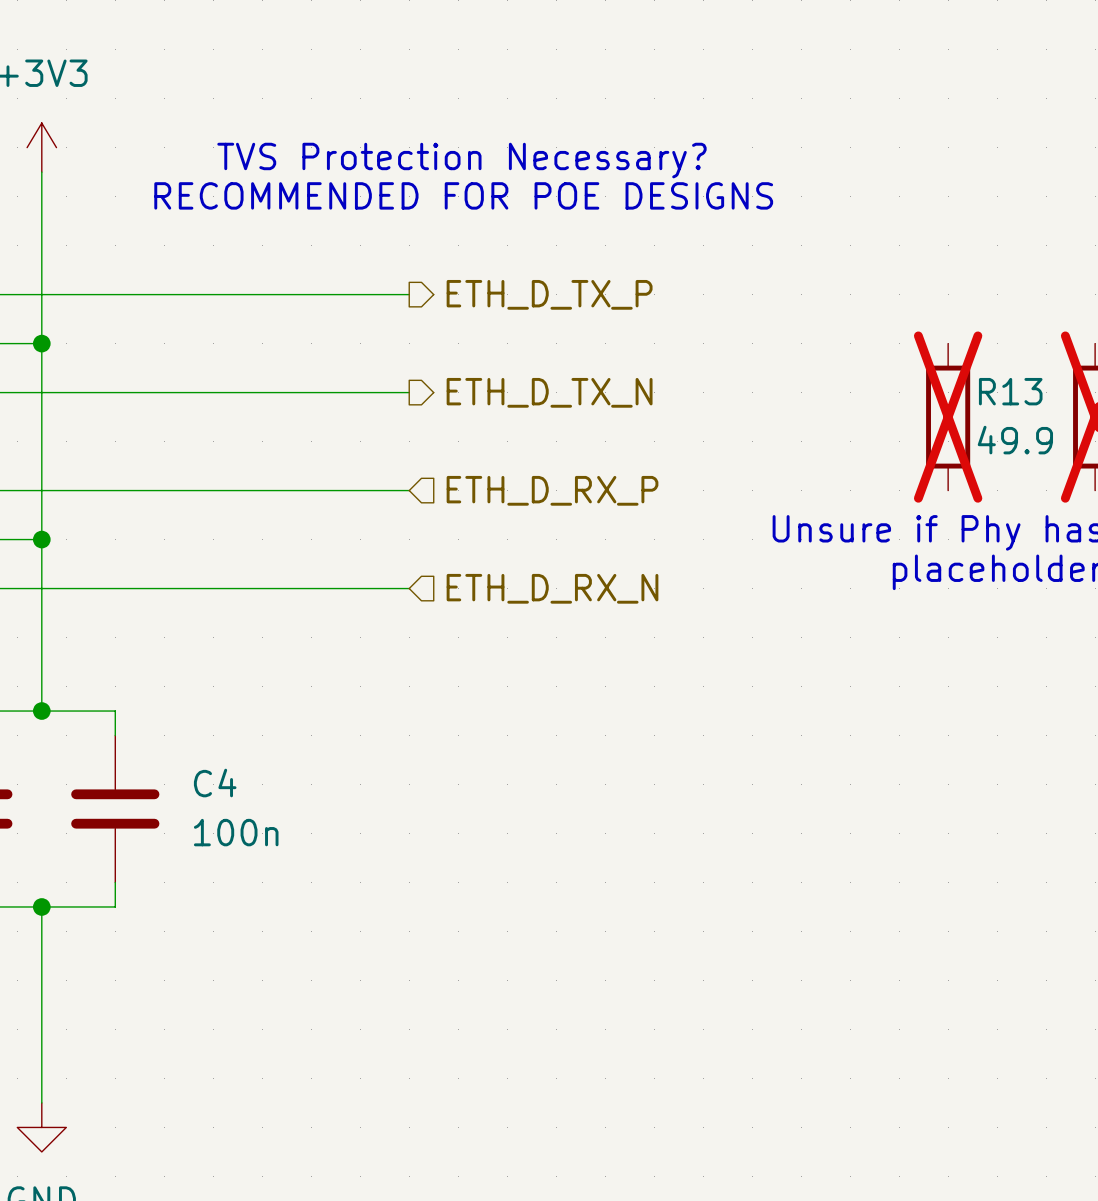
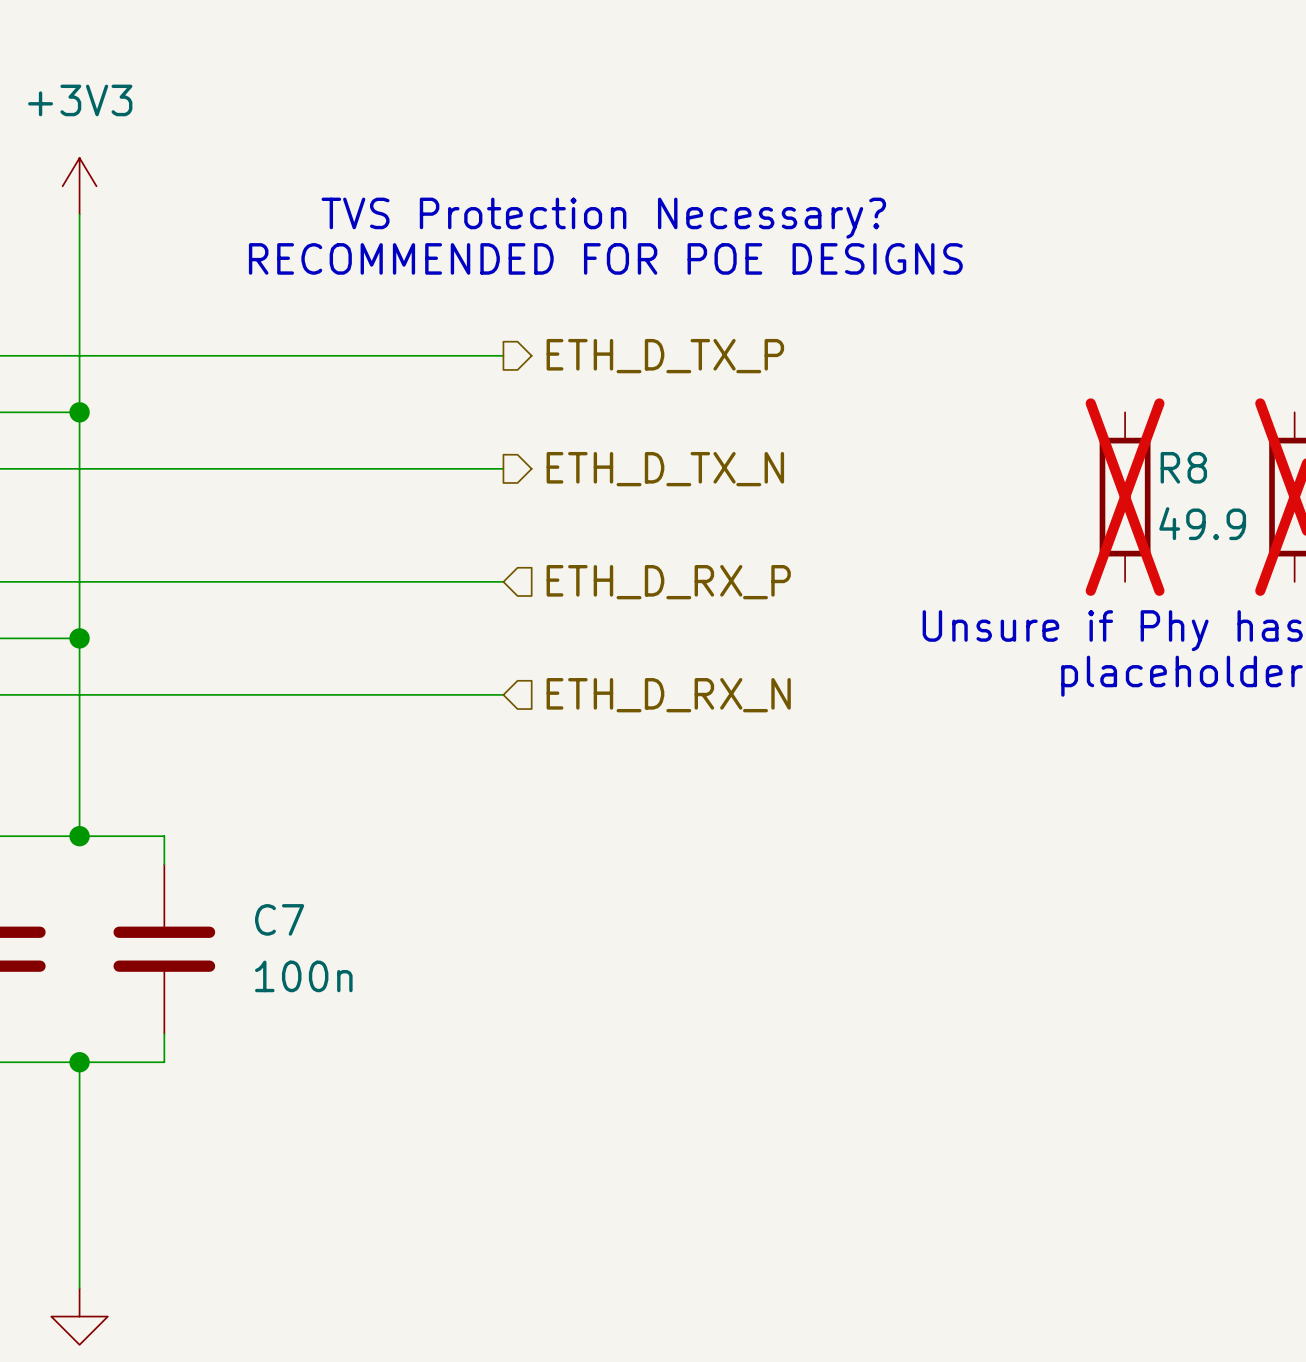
text position: TVS Protection Necessary? (461, 160) -> TVS Protection Necessary? (603, 218)
text position: RECOMMENDED FOR POE DESIGNS (463, 195) -> RECOMMENDED FOR POE DESIGNS (605, 258)
R13 name: R13 (1010, 391) -> R8 (1183, 467)
C4 name: C4 (215, 783) -> C7 (279, 919)

